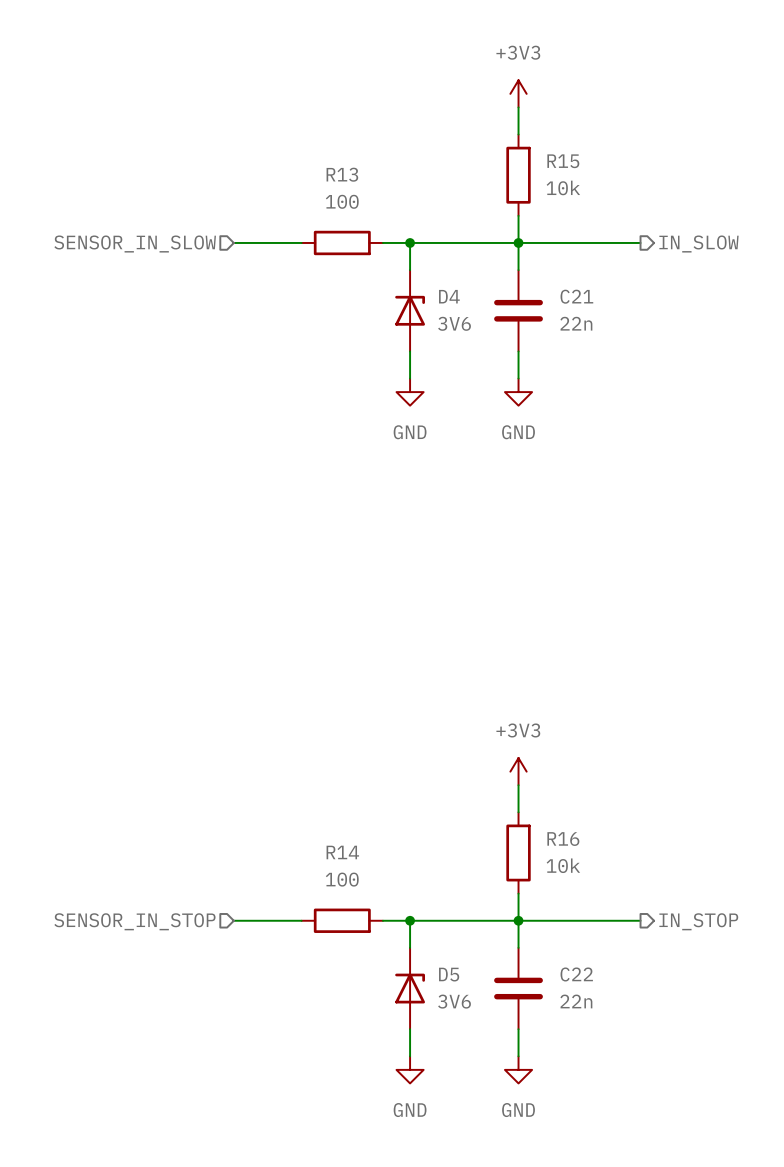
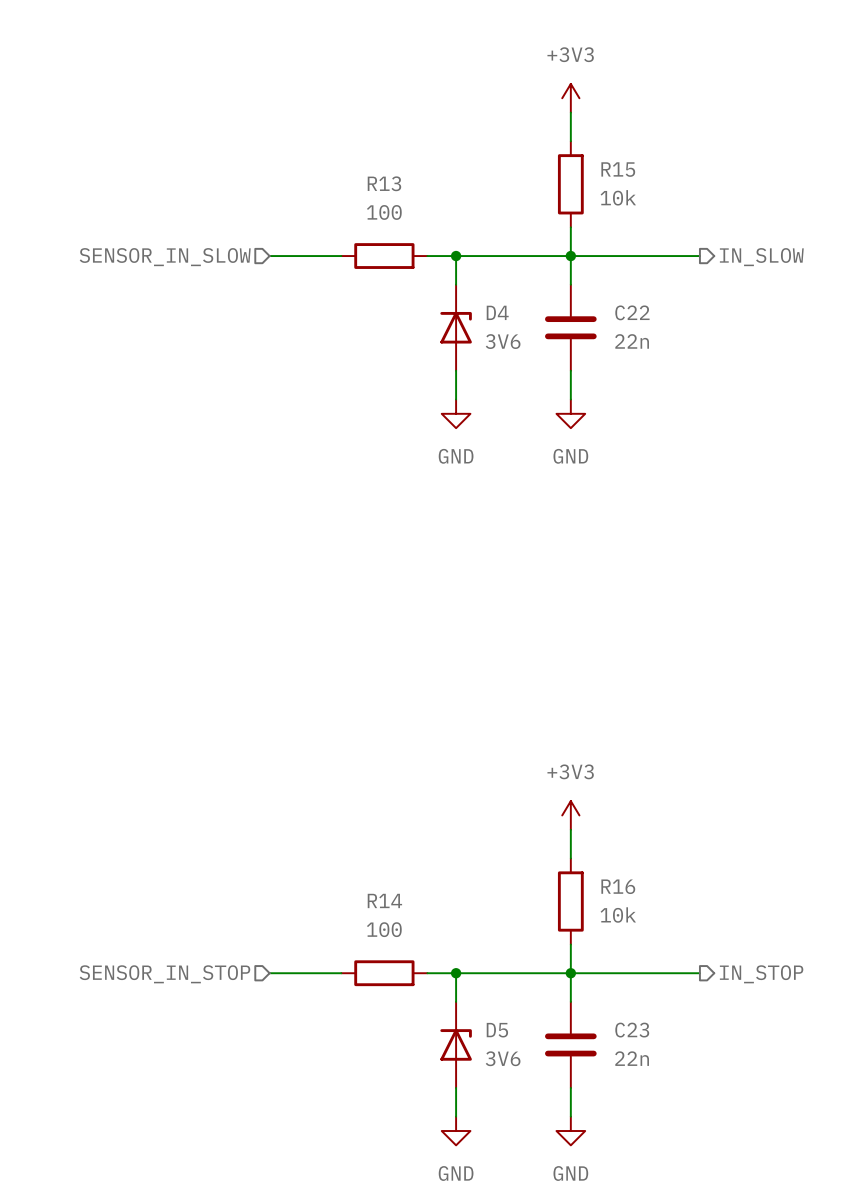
C21 name: C21 (576, 296) -> C22 (632, 312)
C22 name: C22 (576, 974) -> C23 (632, 1030)

